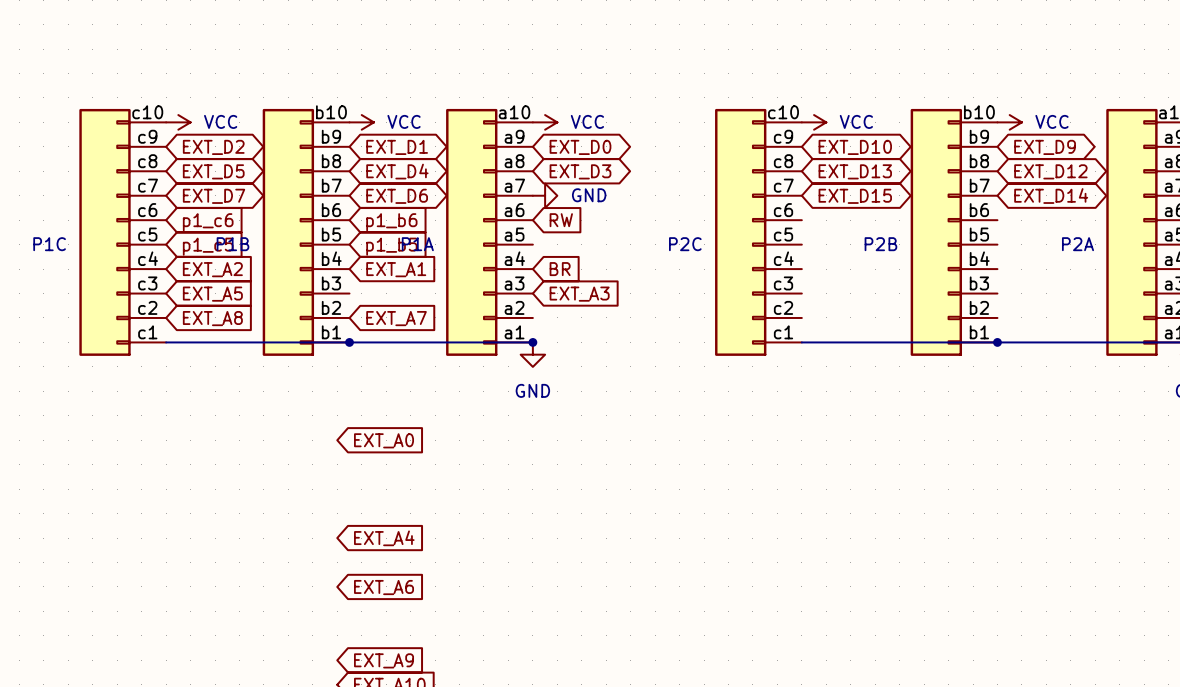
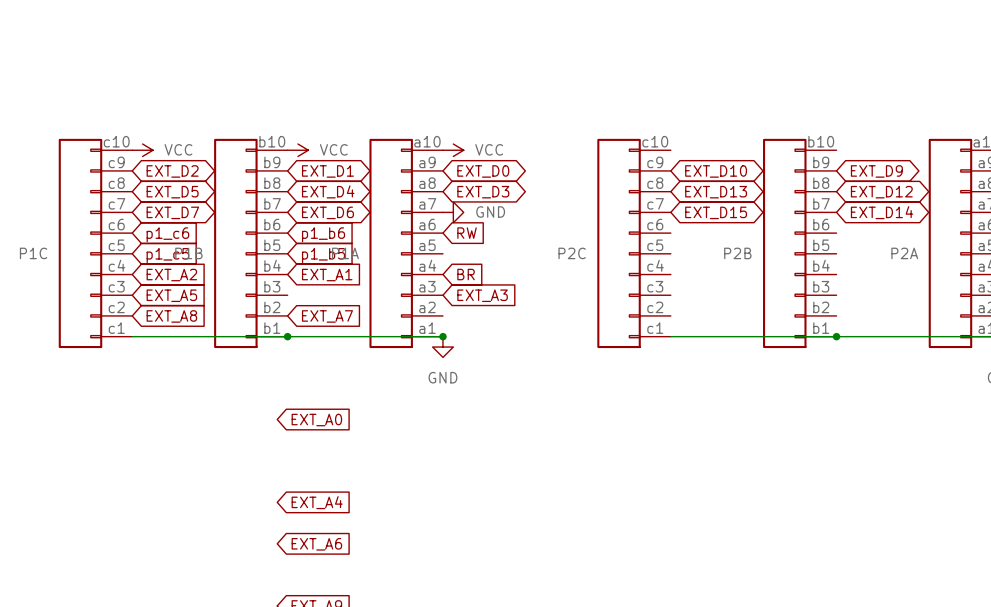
power symbol: VCC (814, 122) -> none
power symbol: VCC (1009, 122) -> none

